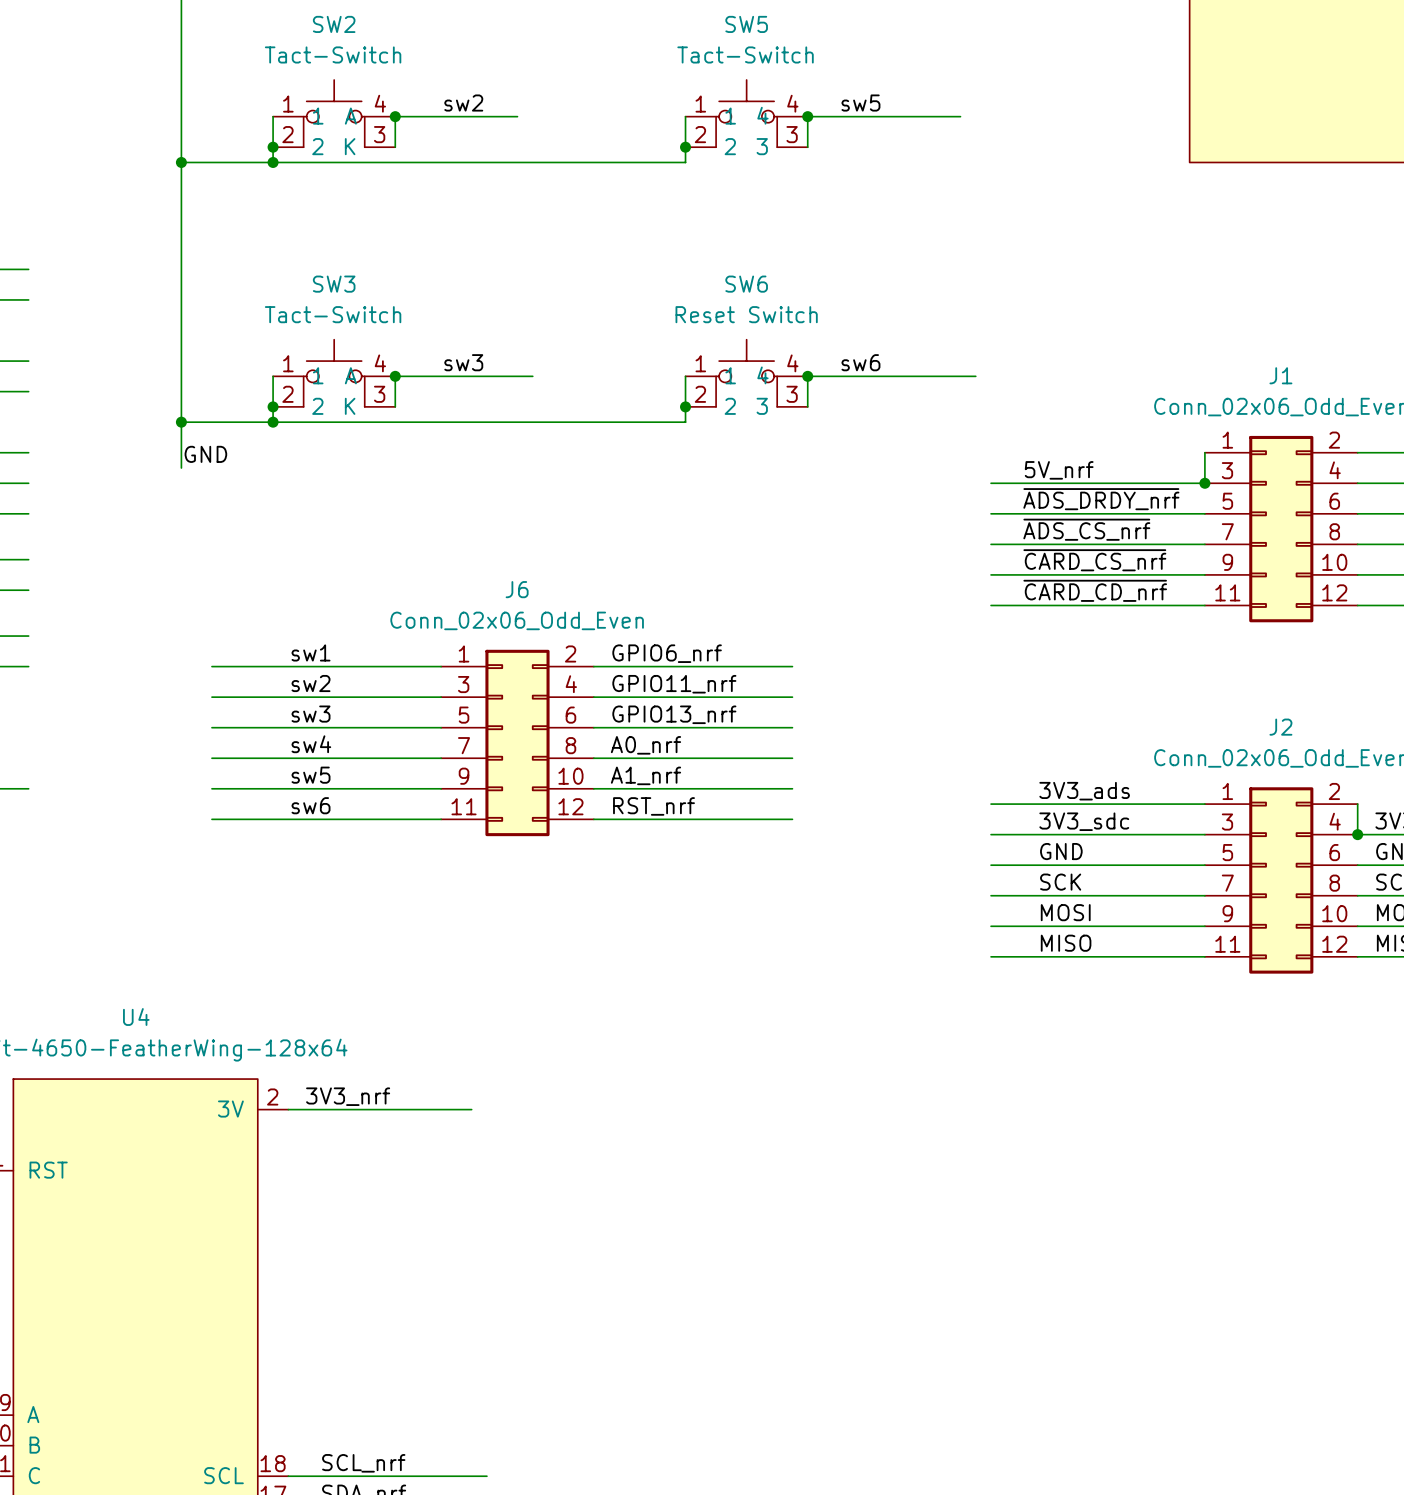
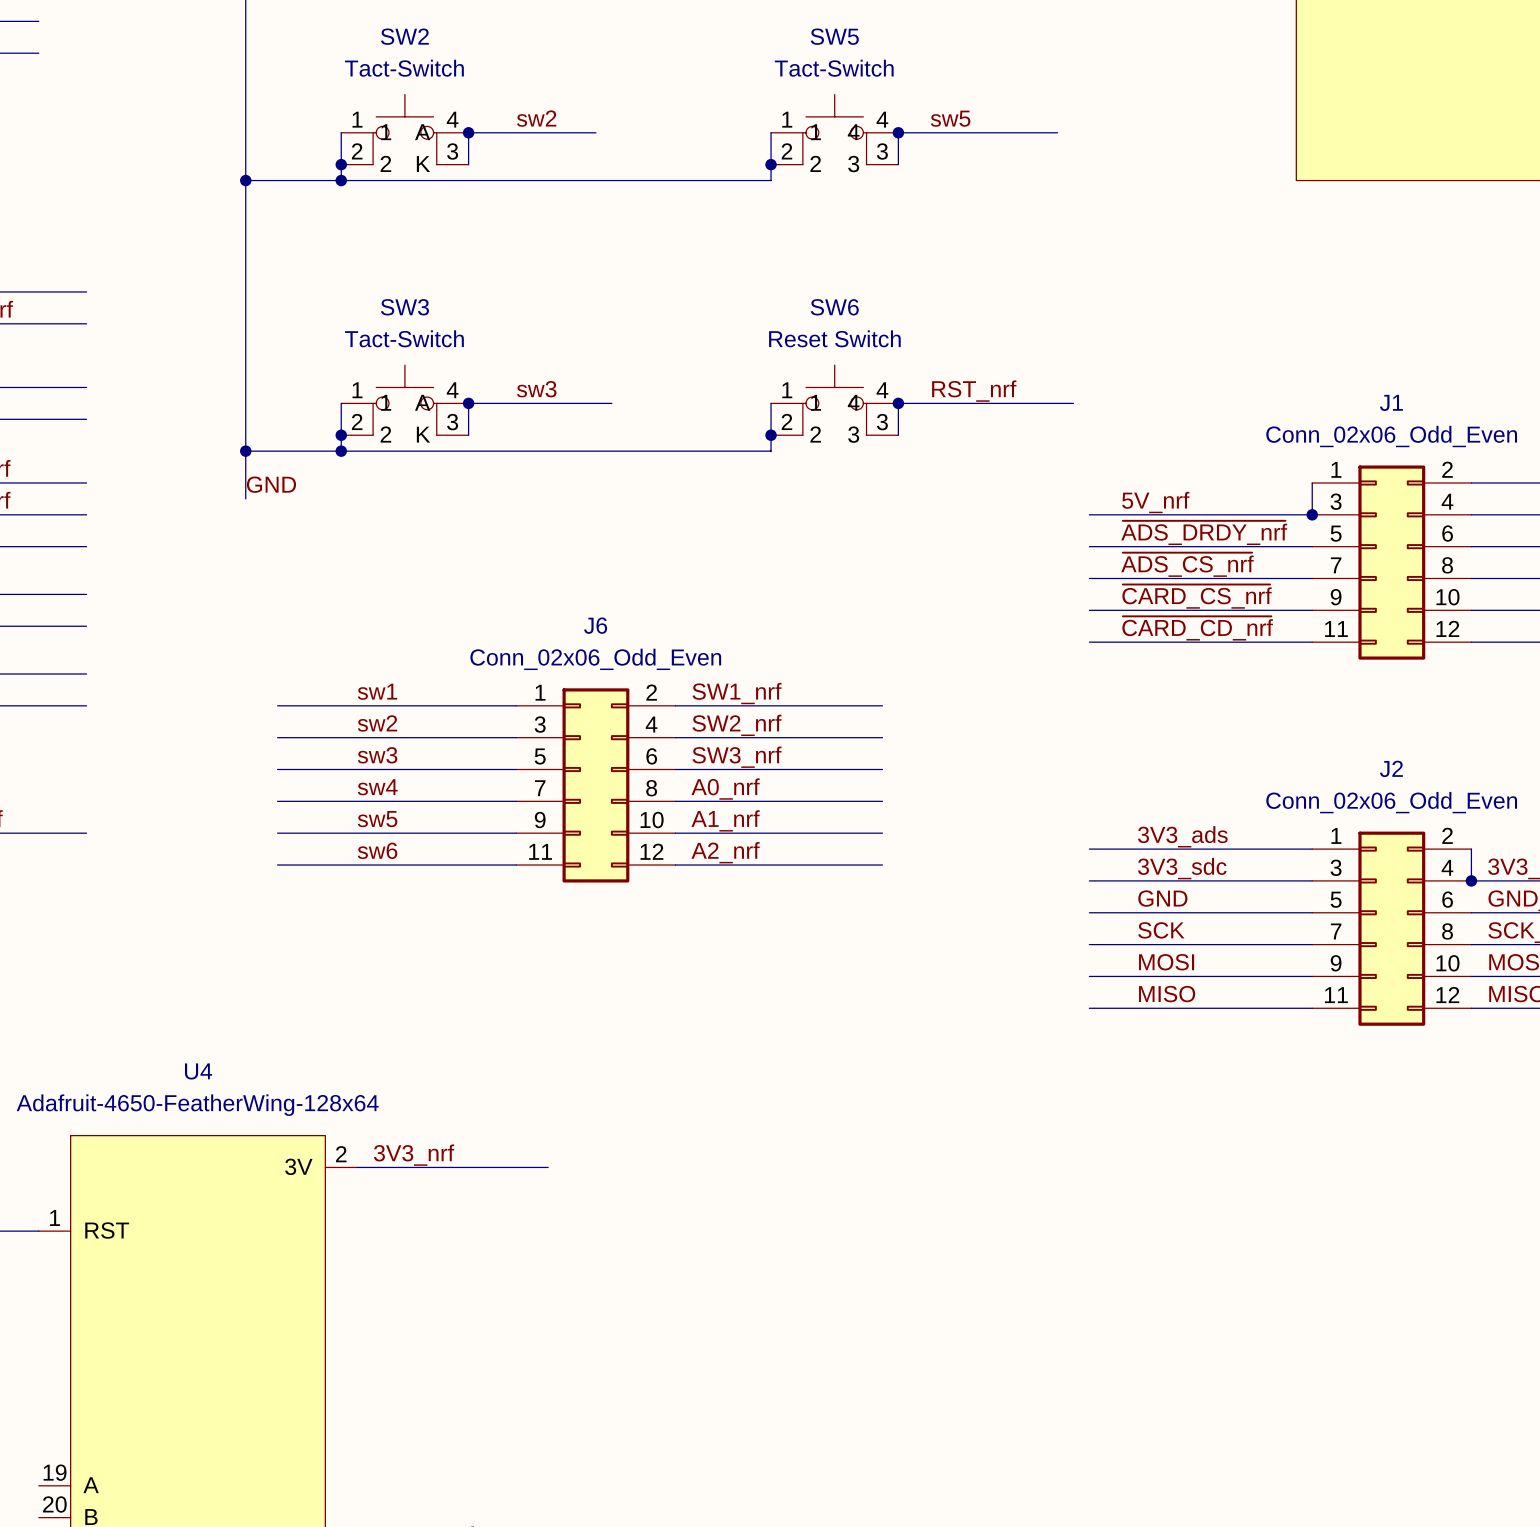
label: sw6 (860, 362) -> RST_nrf (974, 391)
label: GPIO6_nrf (667, 653) -> SW1_nrf (736, 693)
label: GPIO11_nrf (674, 684) -> SW2_nrf (736, 725)
label: GPIO13_nrf (674, 714) -> SW3_nrf (736, 757)
label: RST_nrf (653, 806) -> A2_nrf (725, 852)

